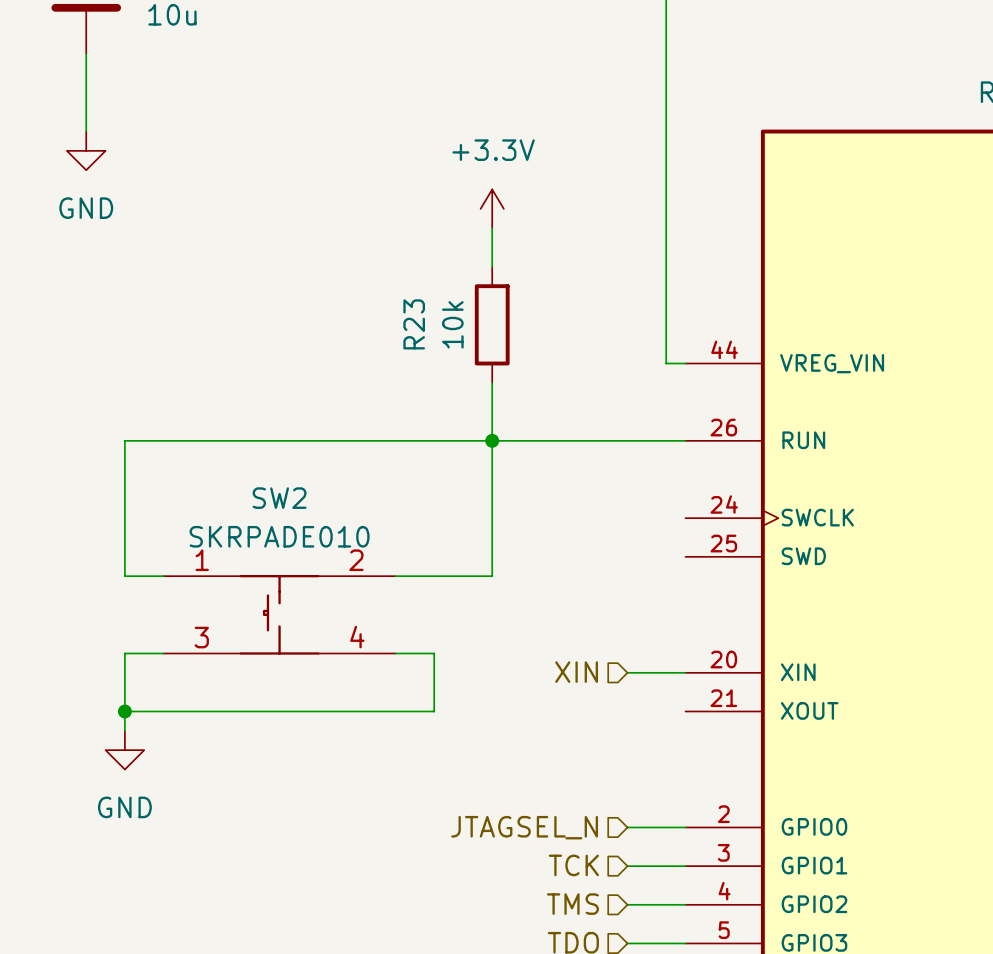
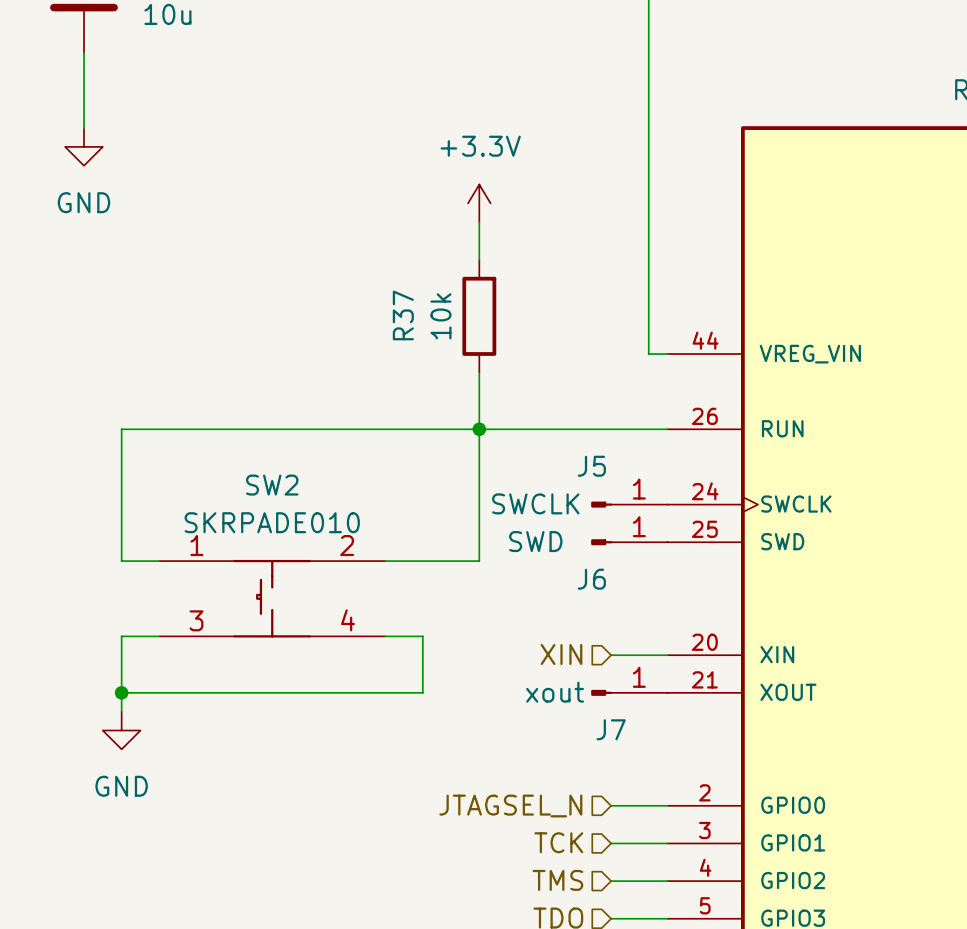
R23 name: R23 (414, 324) -> R37 (403, 315)
J5: none -> SWCLK (629, 504)
J6: none -> SWD (629, 542)
J7: none -> xout (629, 692)

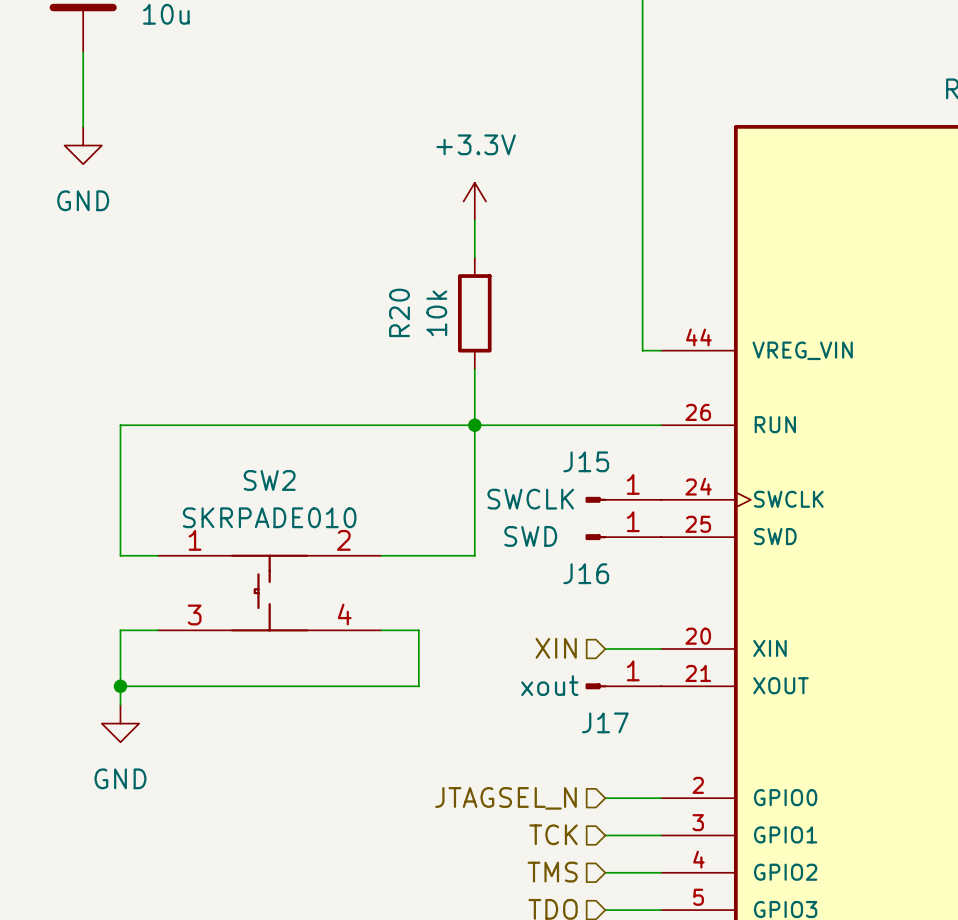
R37 name: R37 (403, 315) -> R20 (399, 312)
J5 name: J5 (591, 466) -> J15 (586, 461)
J6 name: J6 (591, 579) -> J16 (586, 573)
J7 name: J7 (611, 729) -> J17 (605, 722)

